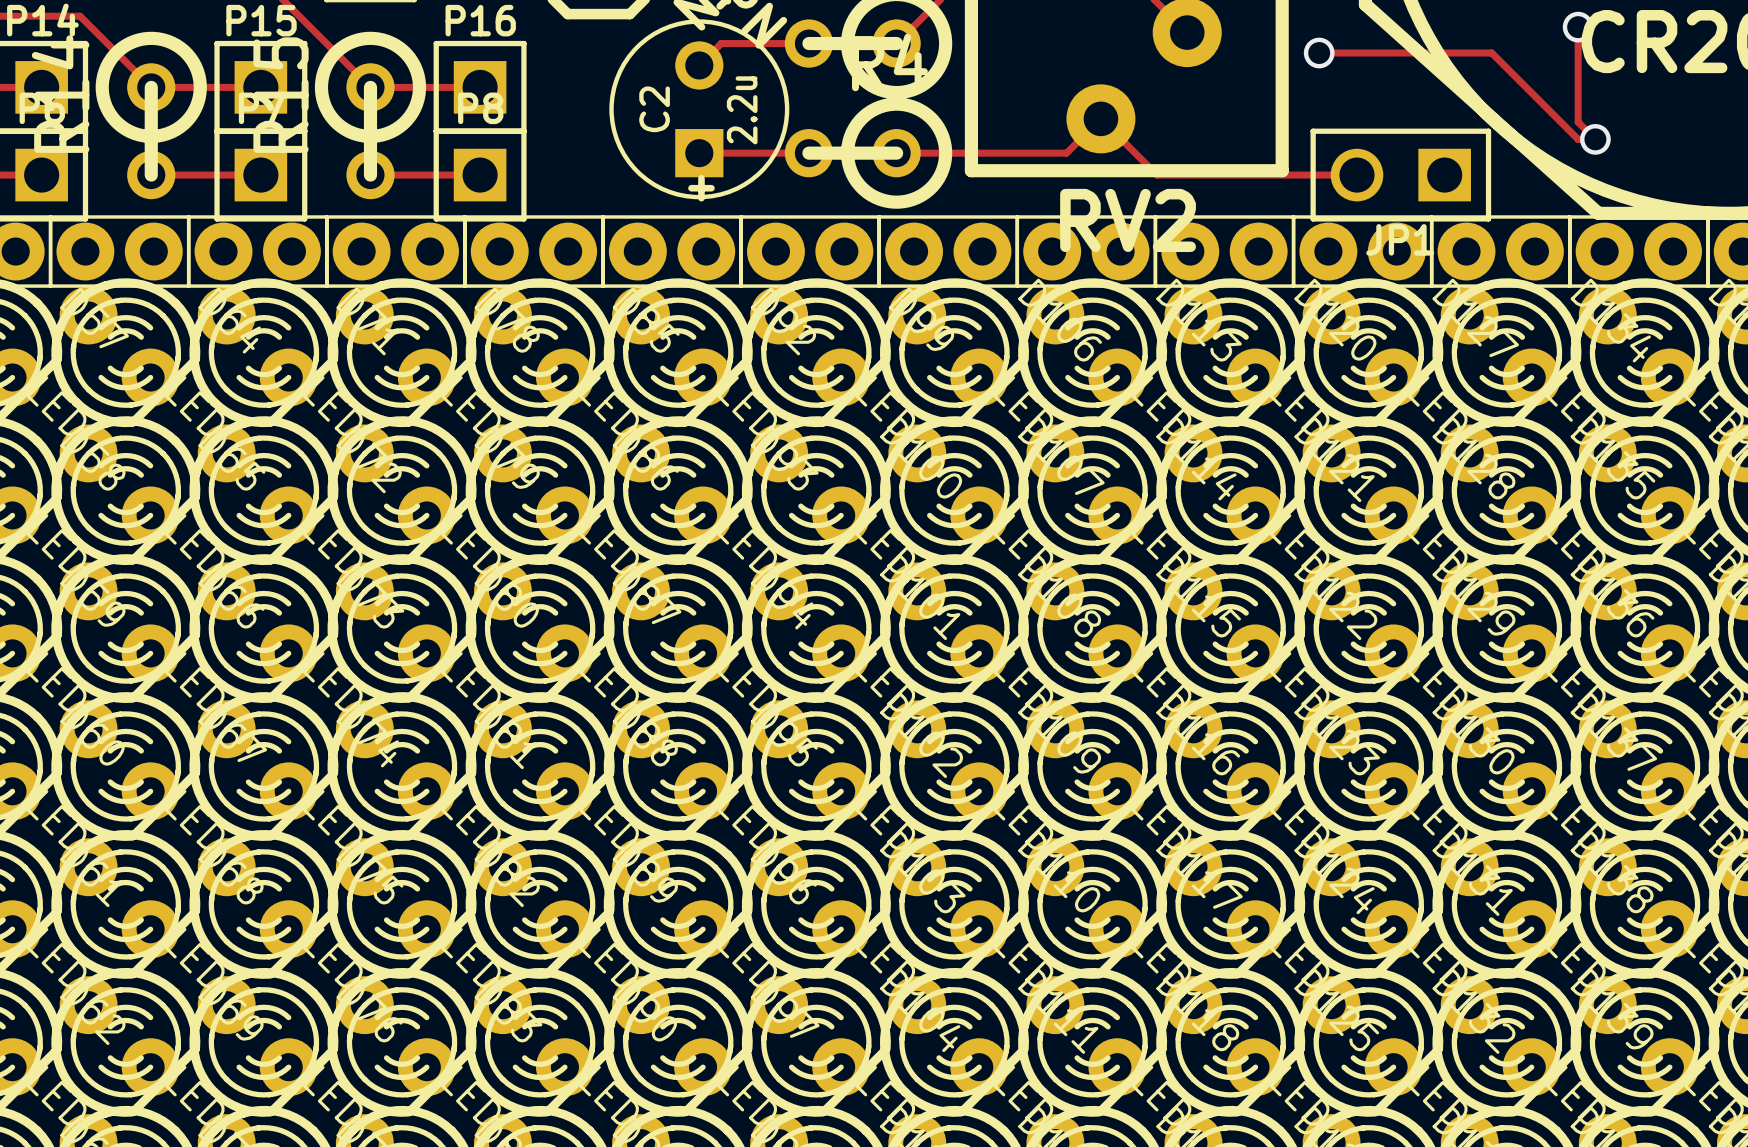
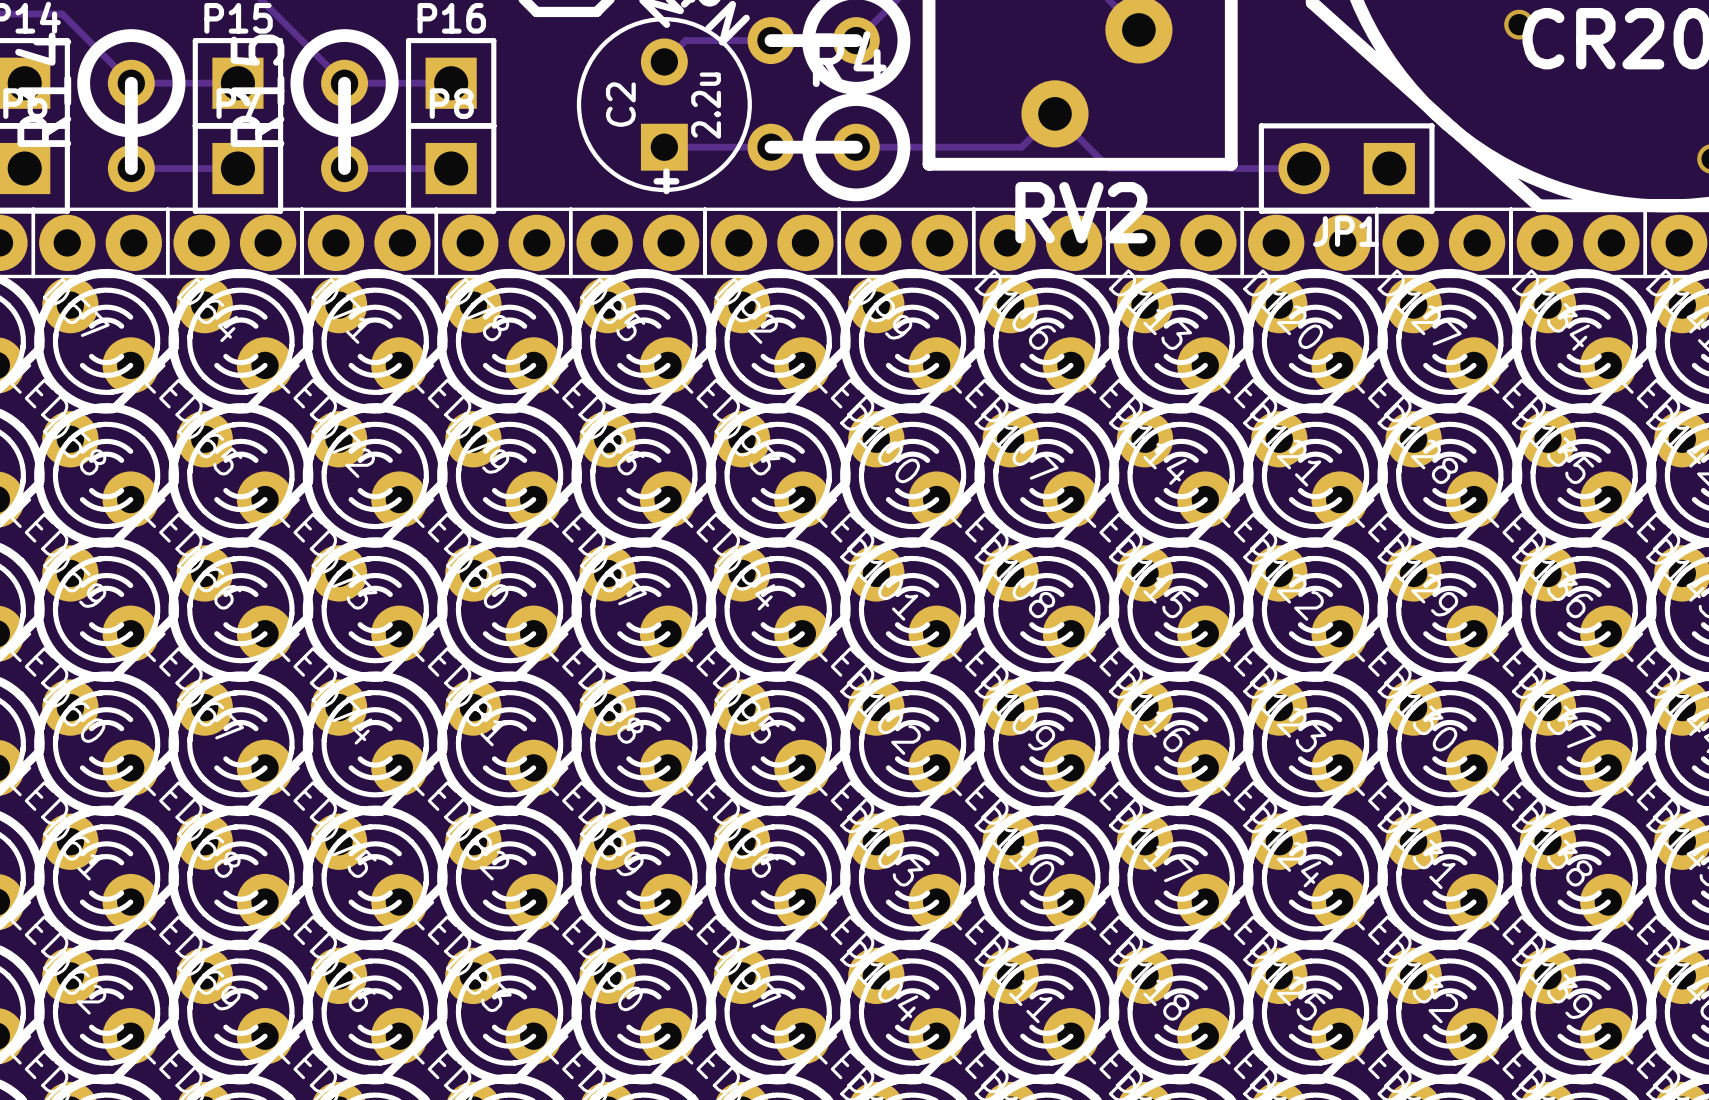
track: (1578, 27) (1578, 122) (1595, 139) (1578, 139) (1491, 53) (1319, 53) -> none
via: (1319, 53) -> none
via: (1595, 139) -> none

